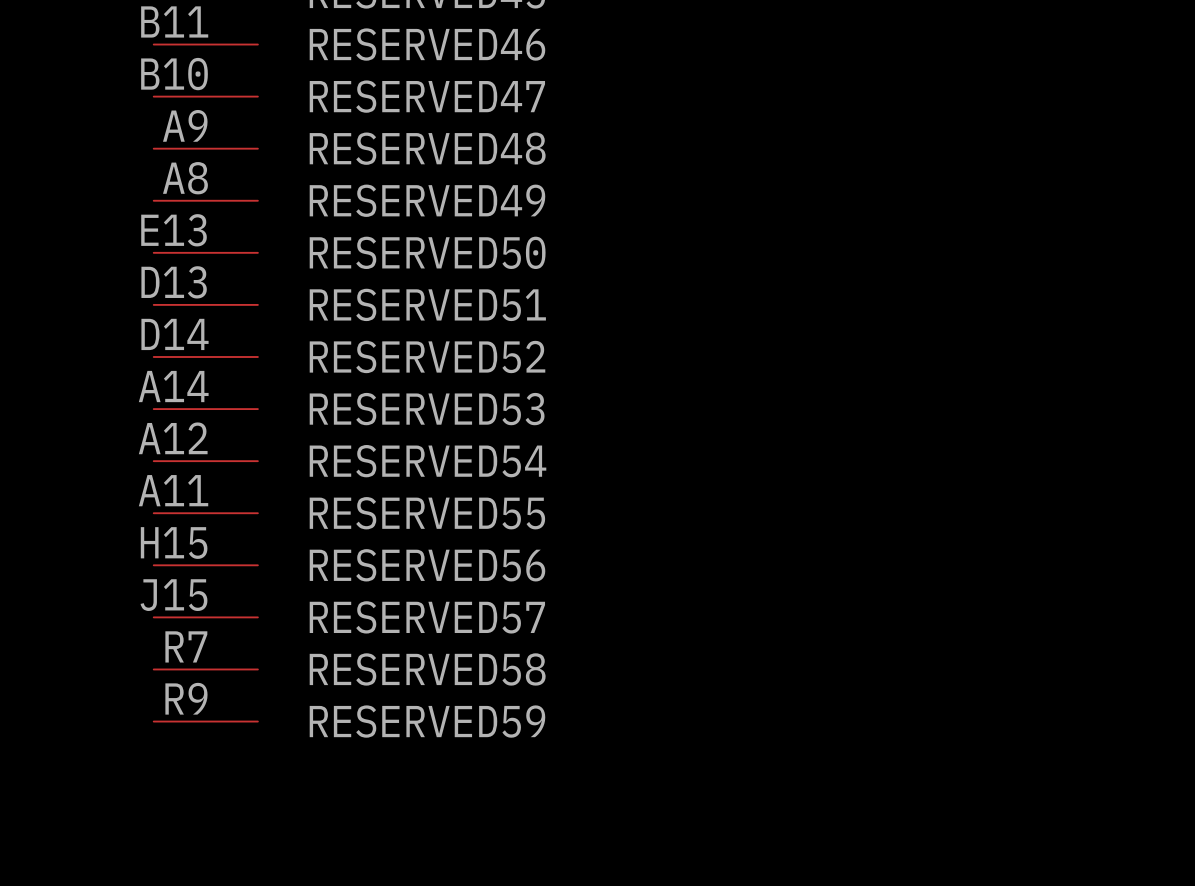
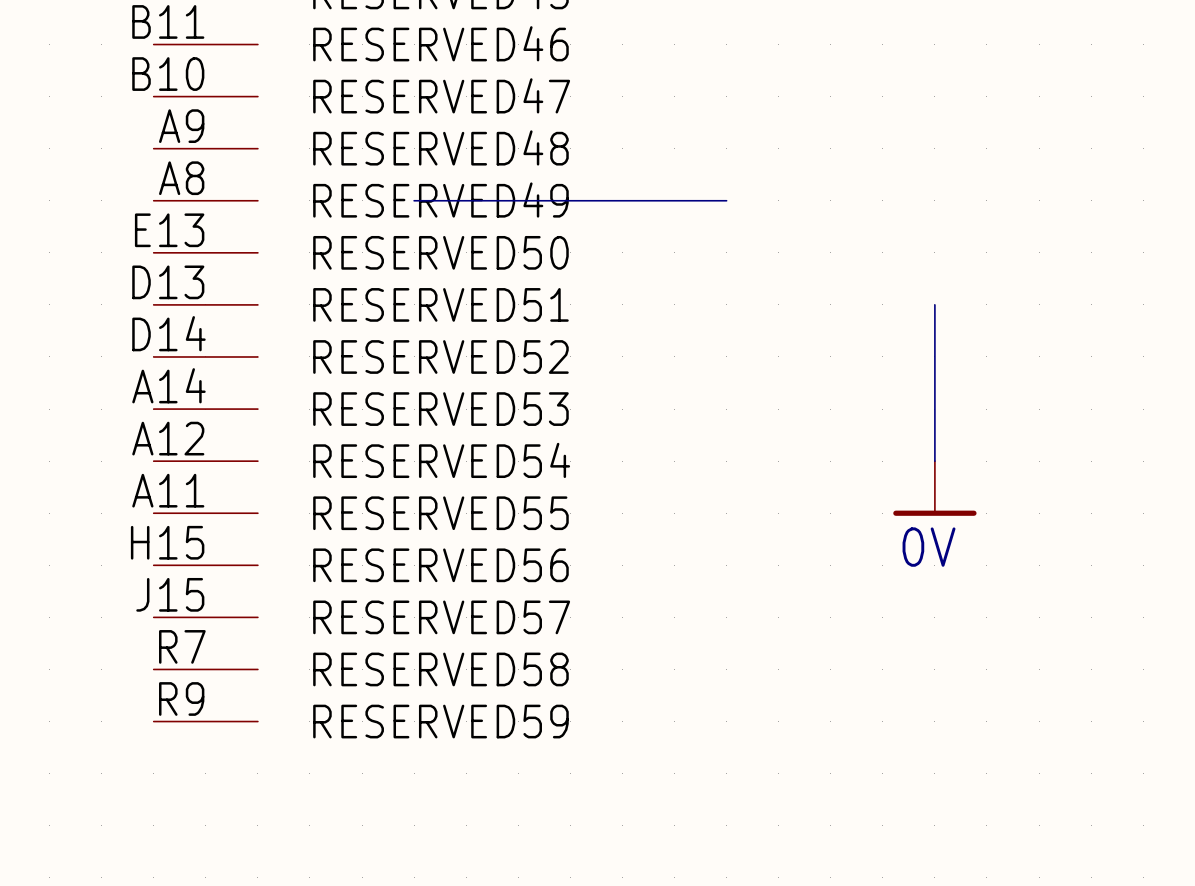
wire: none -> (414, 200) (726, 200)
wire: none -> (934, 304) (934, 461)
power symbol: none -> 0V (934, 488)

